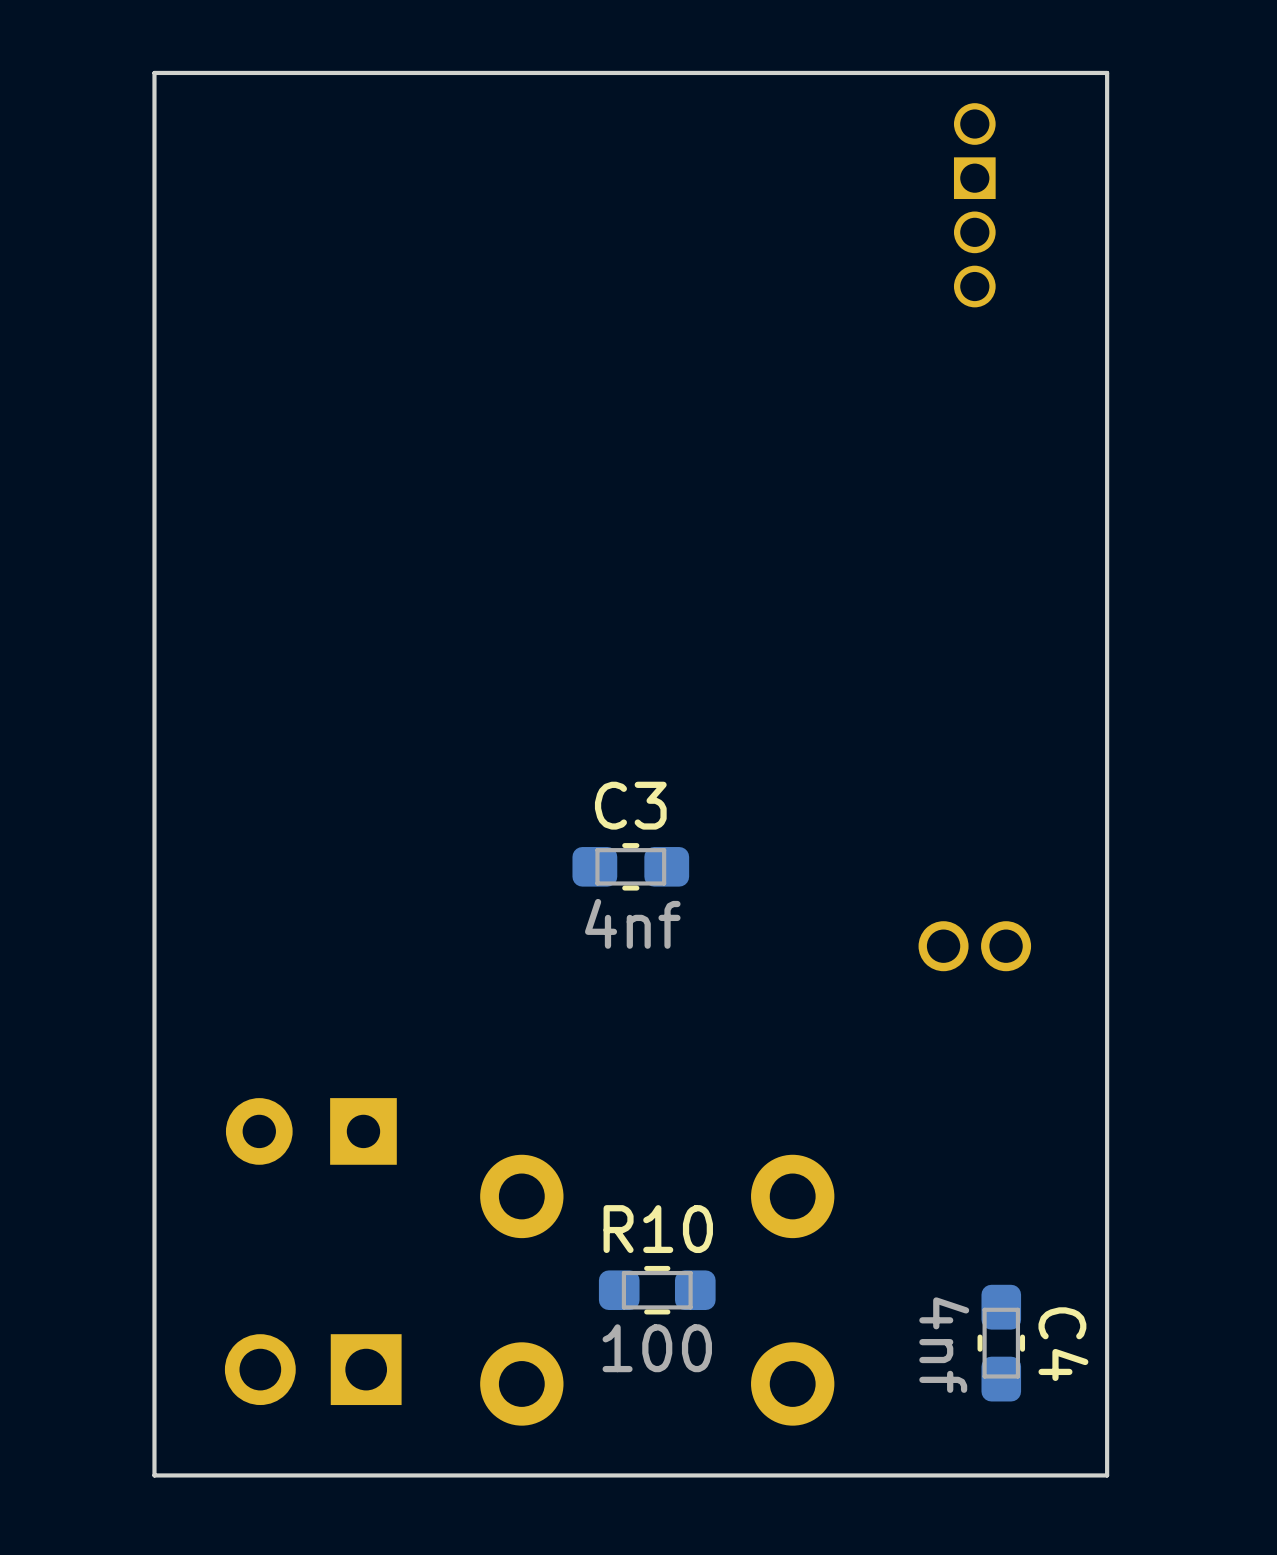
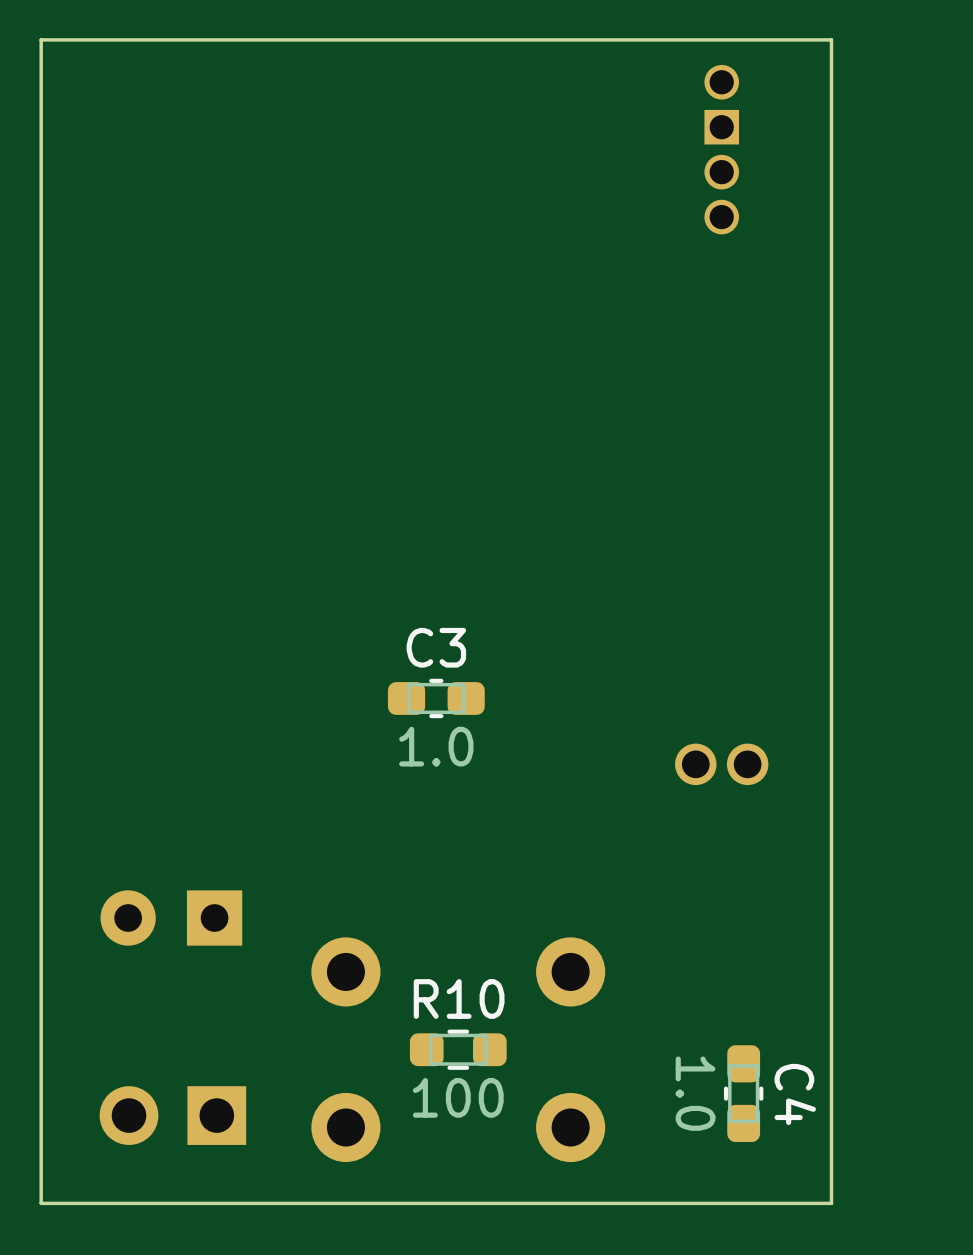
C3 value: 4nf (632, 923) -> 1.0 (436, 746)
C4 value: 4nf (944, 1345) -> 1.0 (695, 1093)

